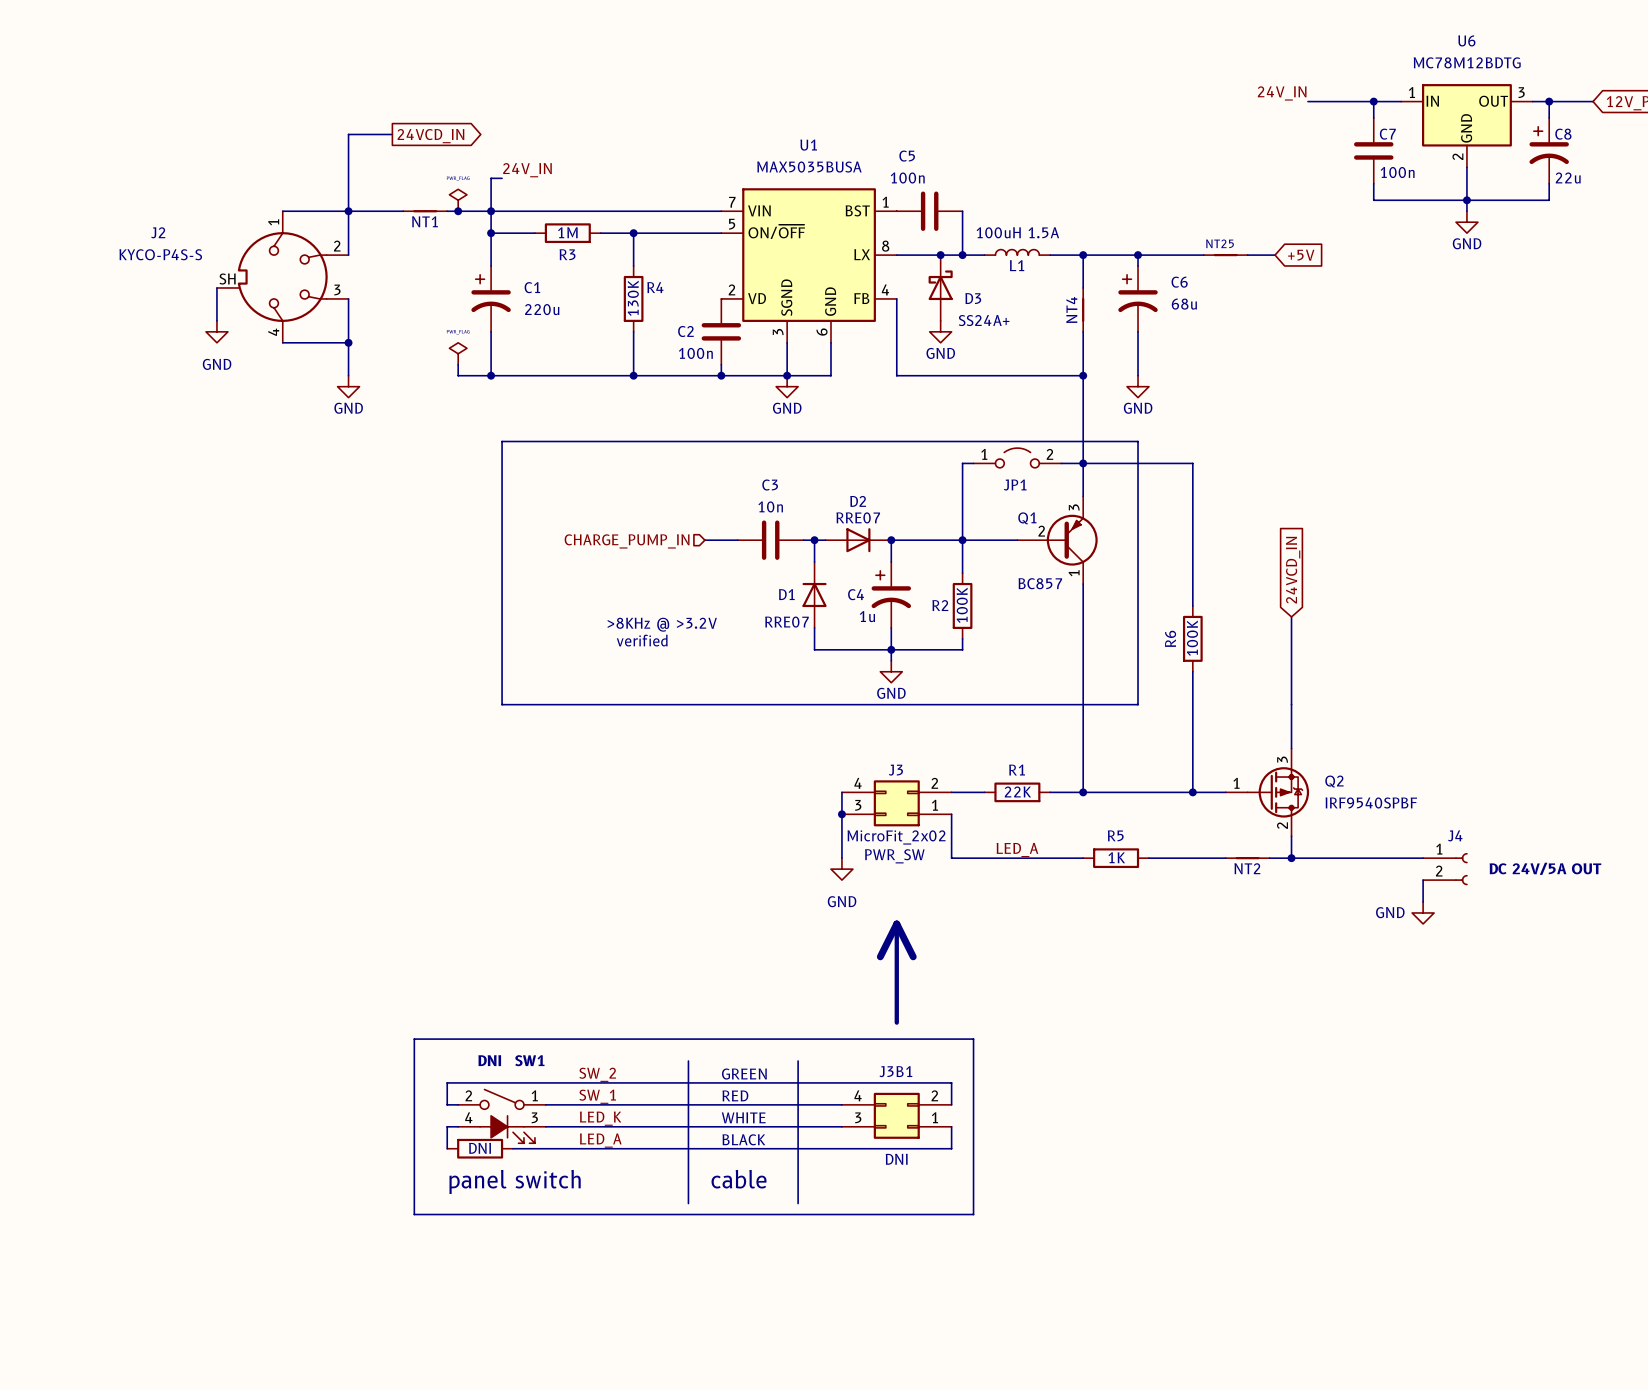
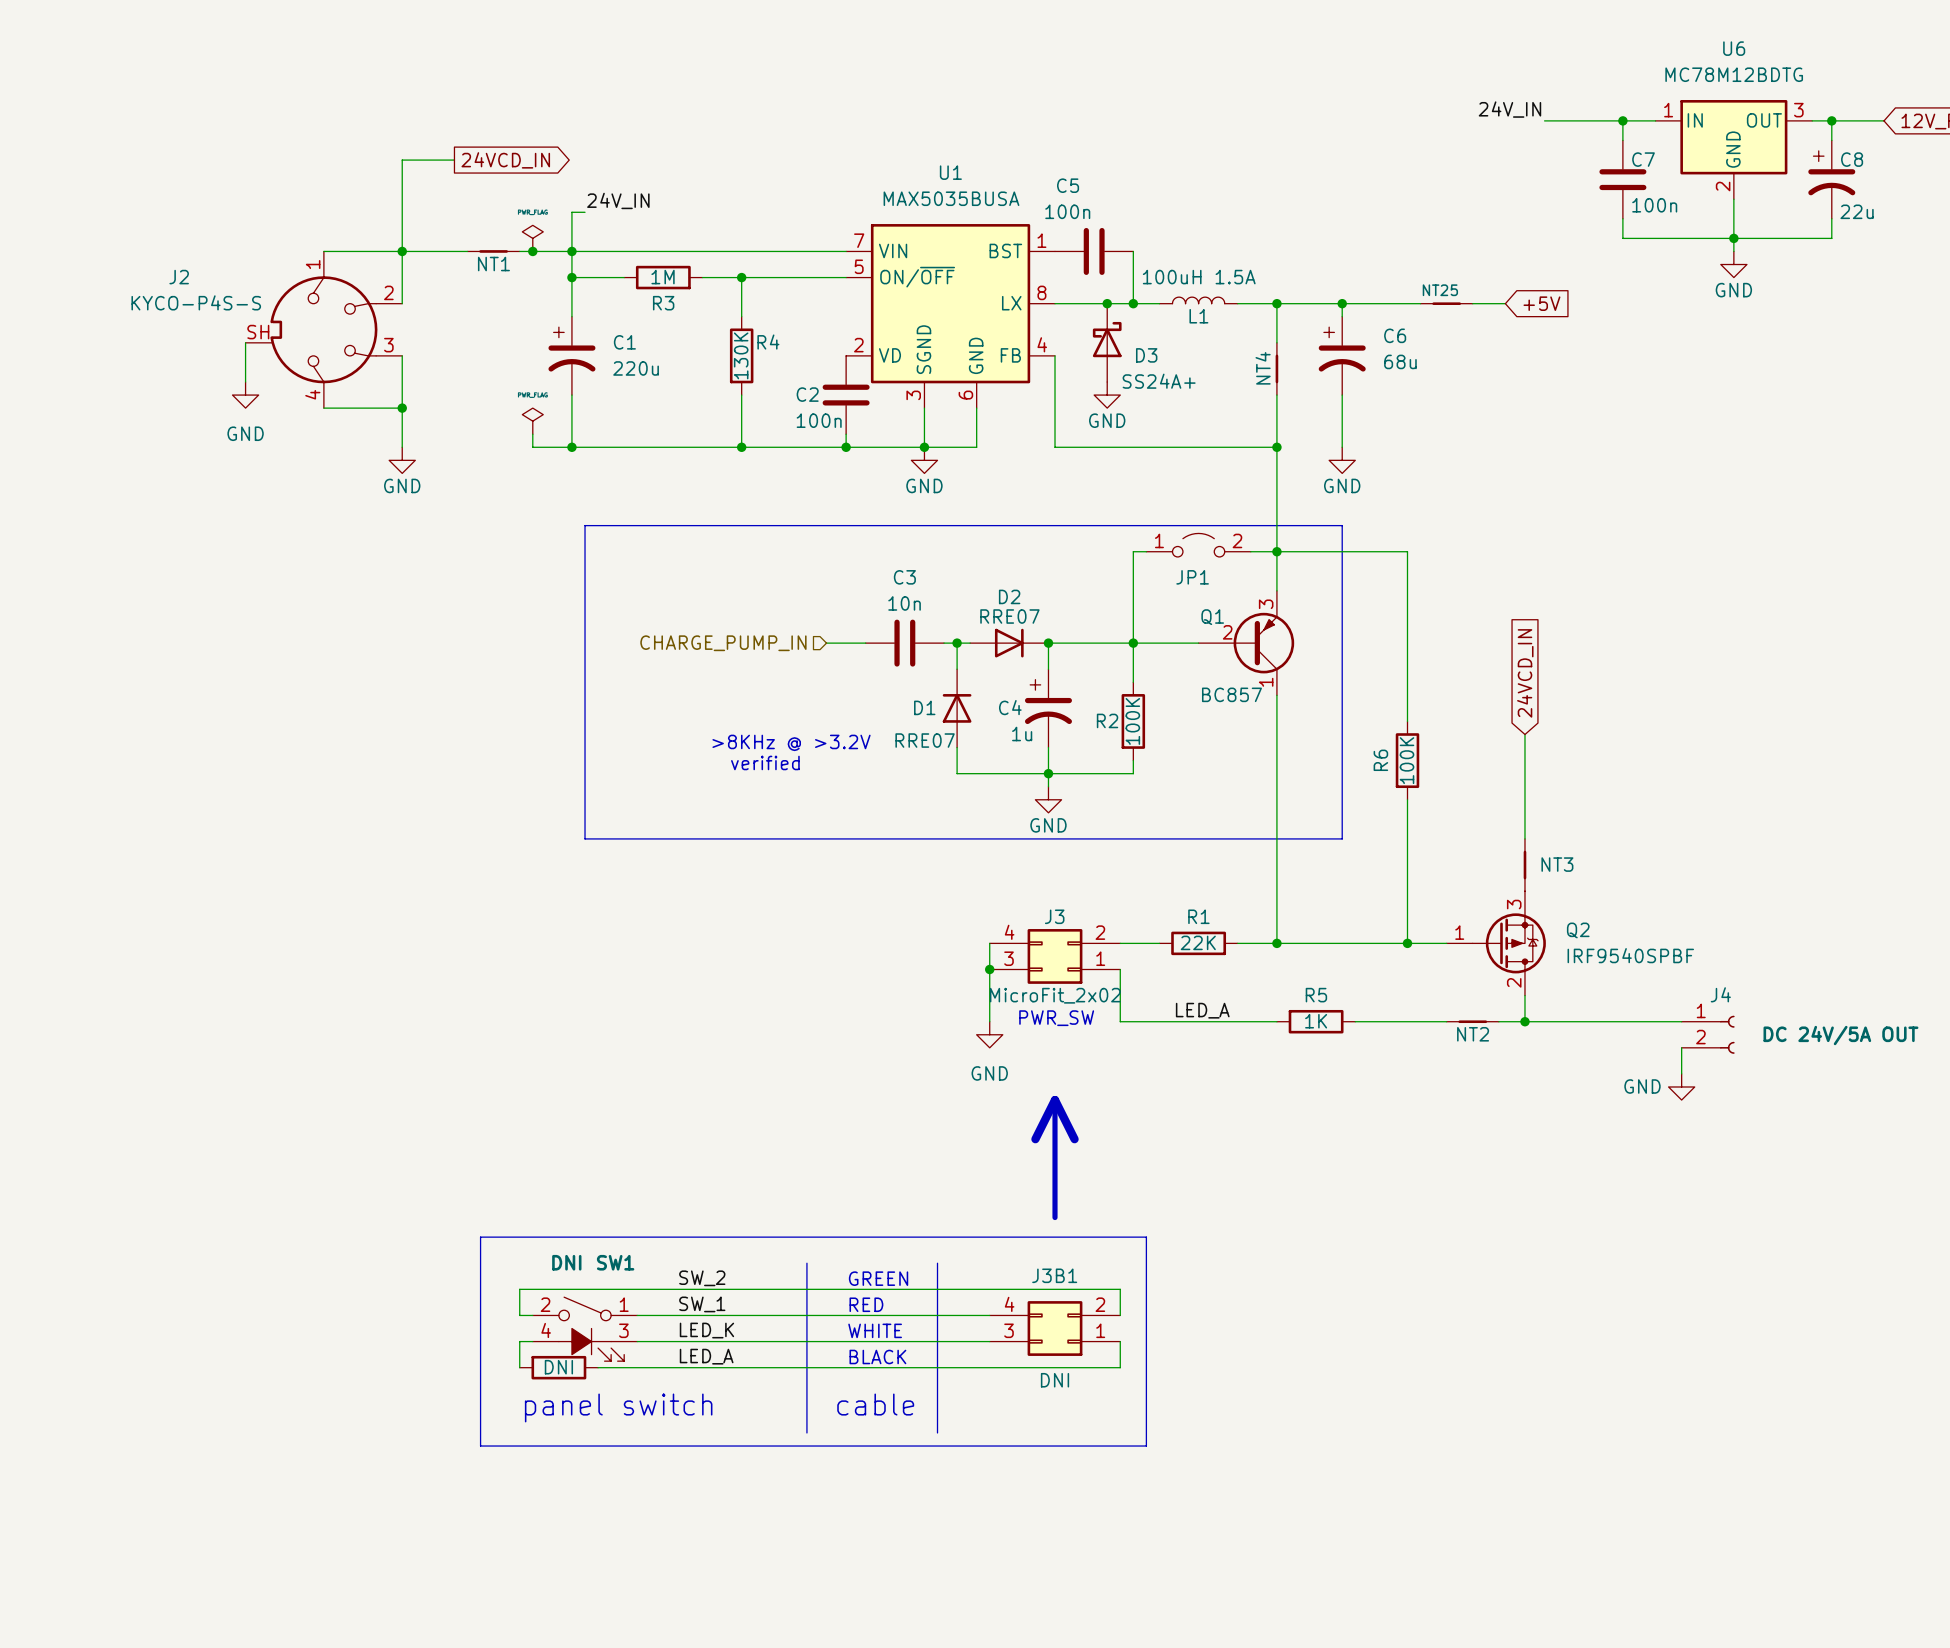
NT3: none -> (1524, 865)

